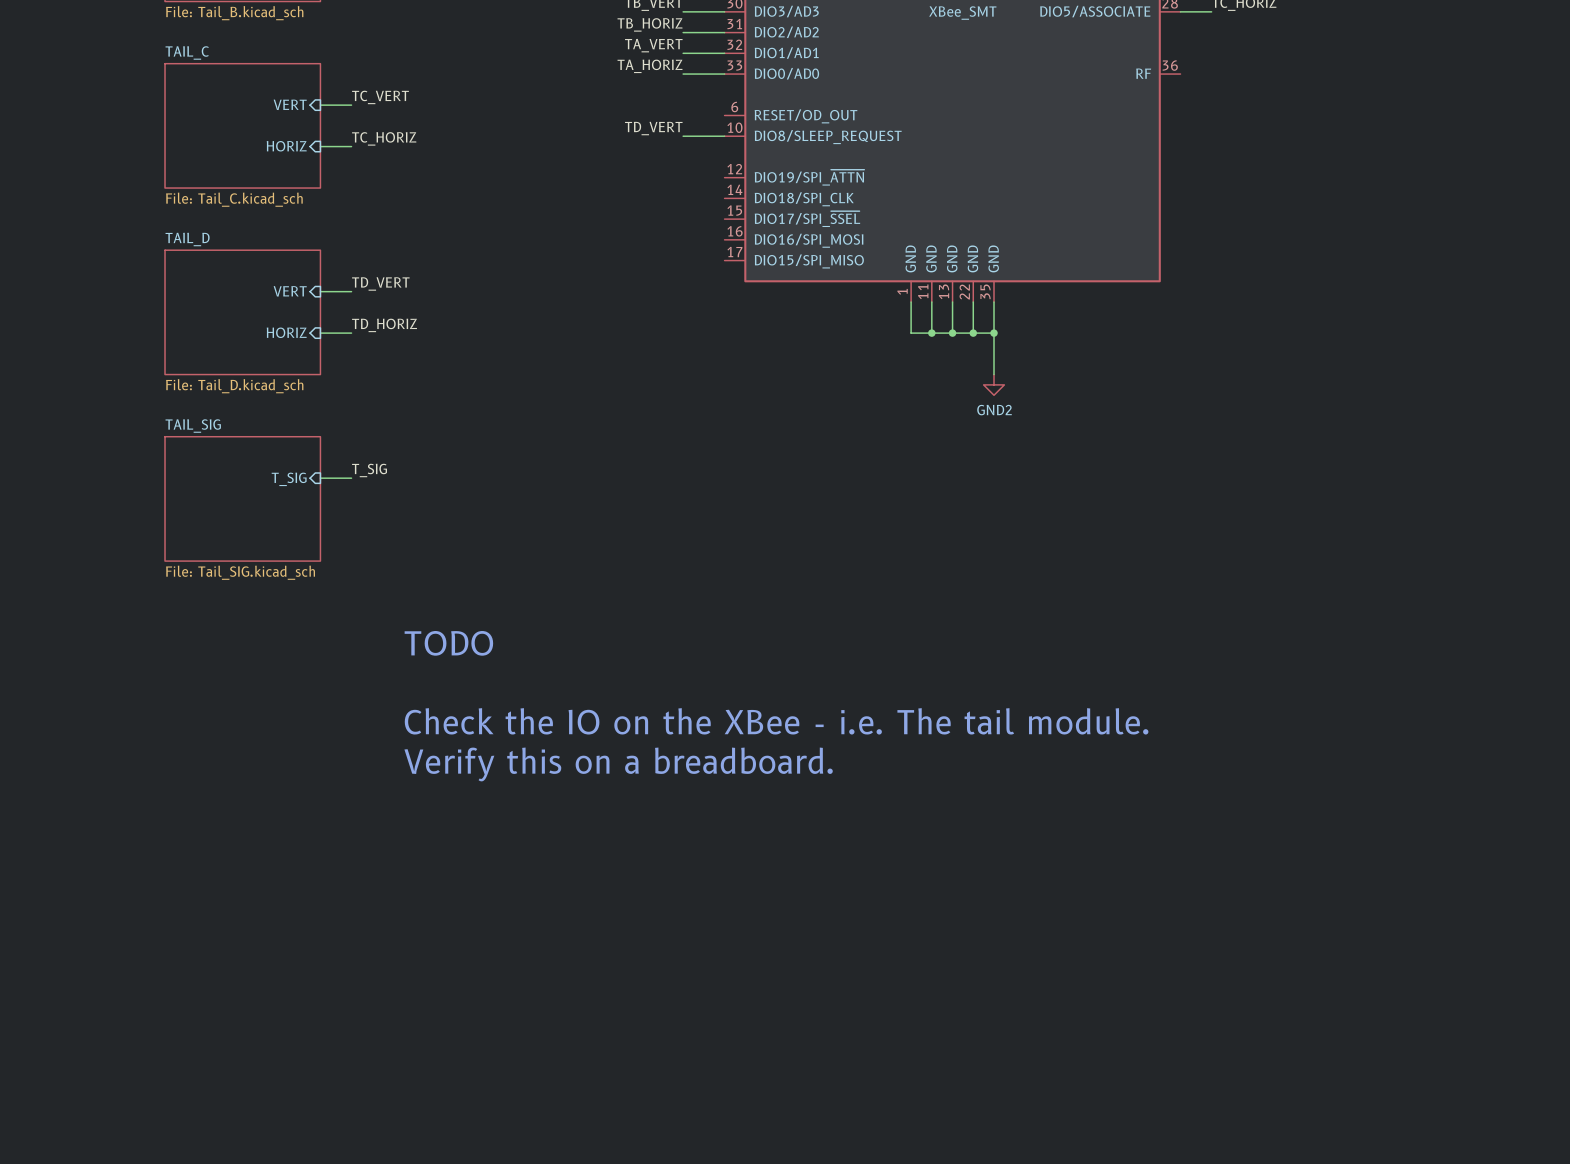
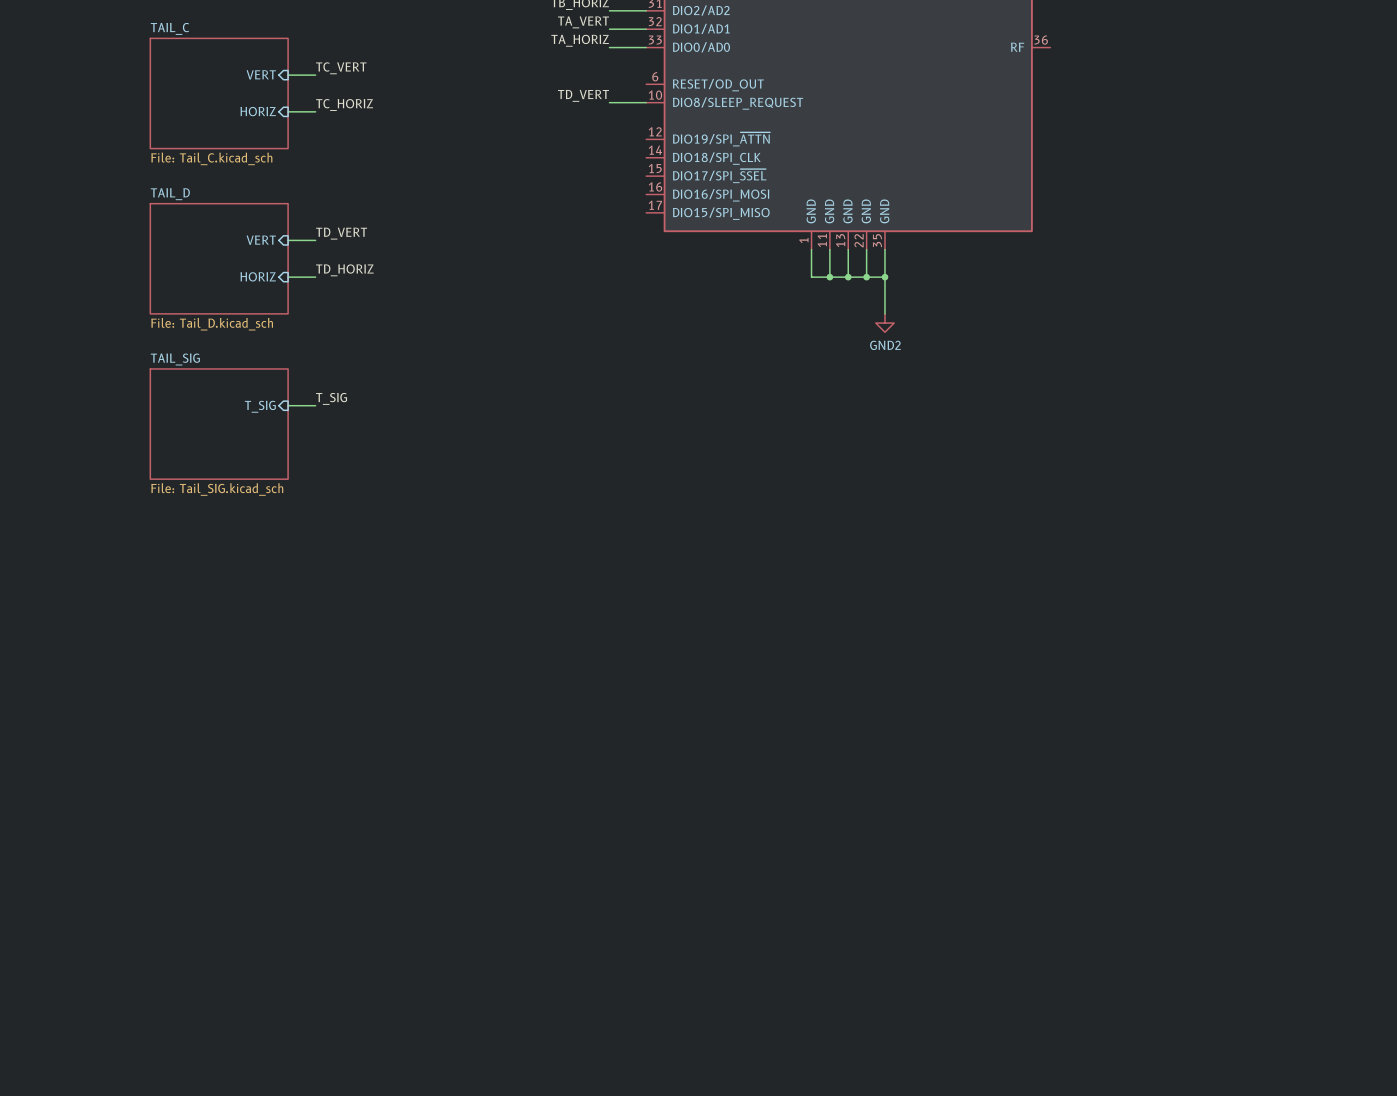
text: TODO (448, 643) -> none
text: Check the IO on the XBee - i.e. The tail module. (776, 721) -> none
text: Verify this on a breadboard. (618, 764) -> none

